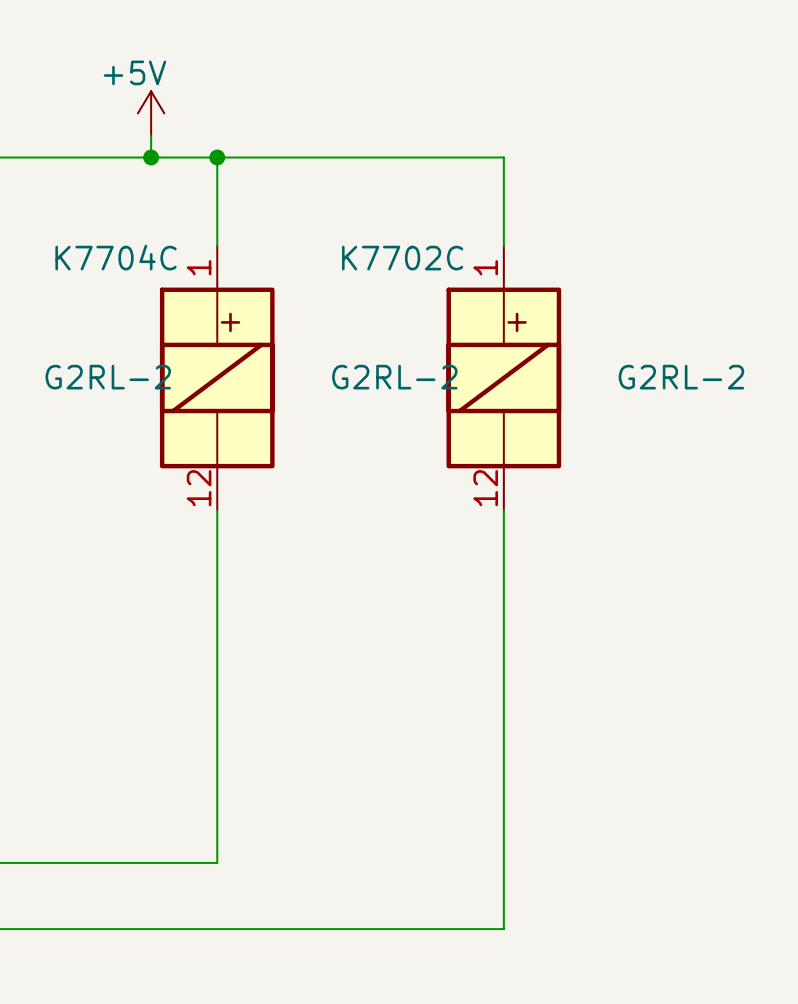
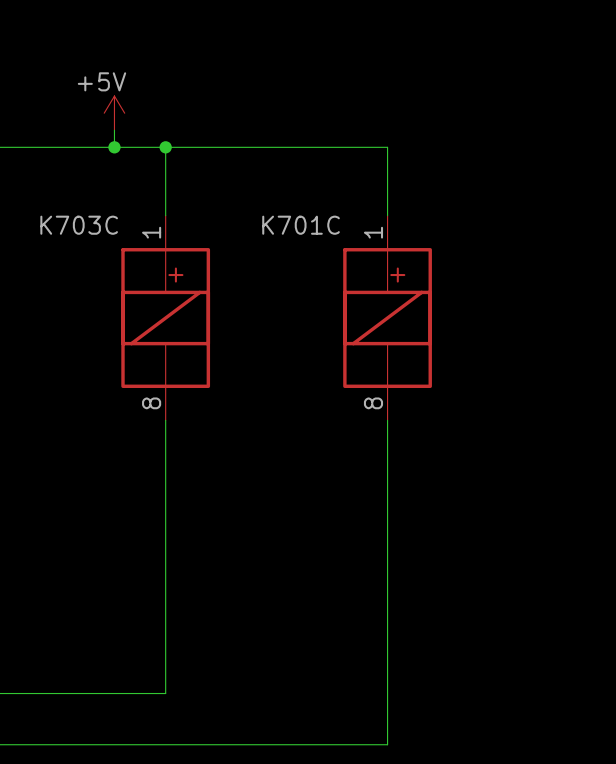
K7704C name: K7704C (116, 257) -> K703C (79, 225)
K7702C name: K7702C (402, 258) -> K701C (301, 225)
part value: G2RL-2 (108, 377) -> none
K7704C value: G2RL-2 (394, 377) -> none
K7702C value: G2RL-2 (681, 377) -> none
K7704C pin number: 12 (199, 488) -> 8 (151, 403)
K7702C pin number: 12 (485, 488) -> 8 (373, 403)

